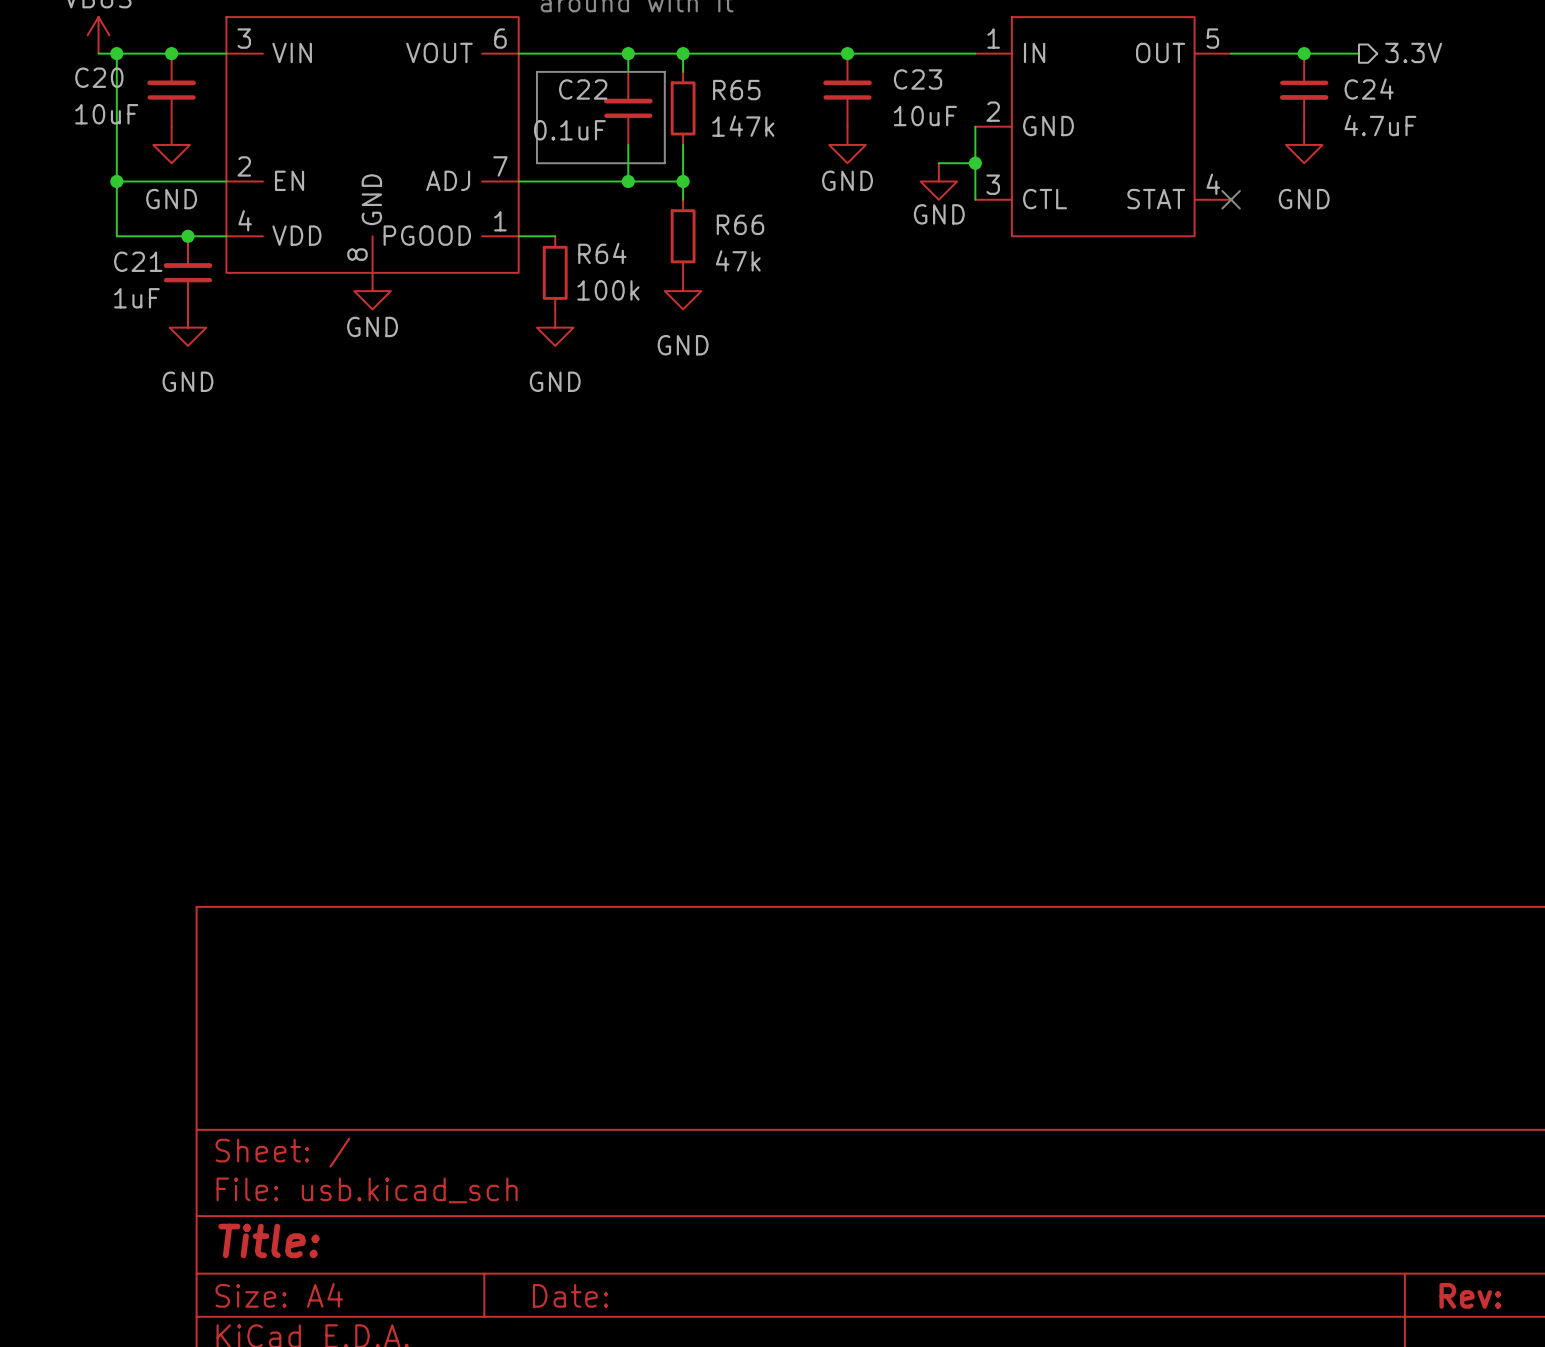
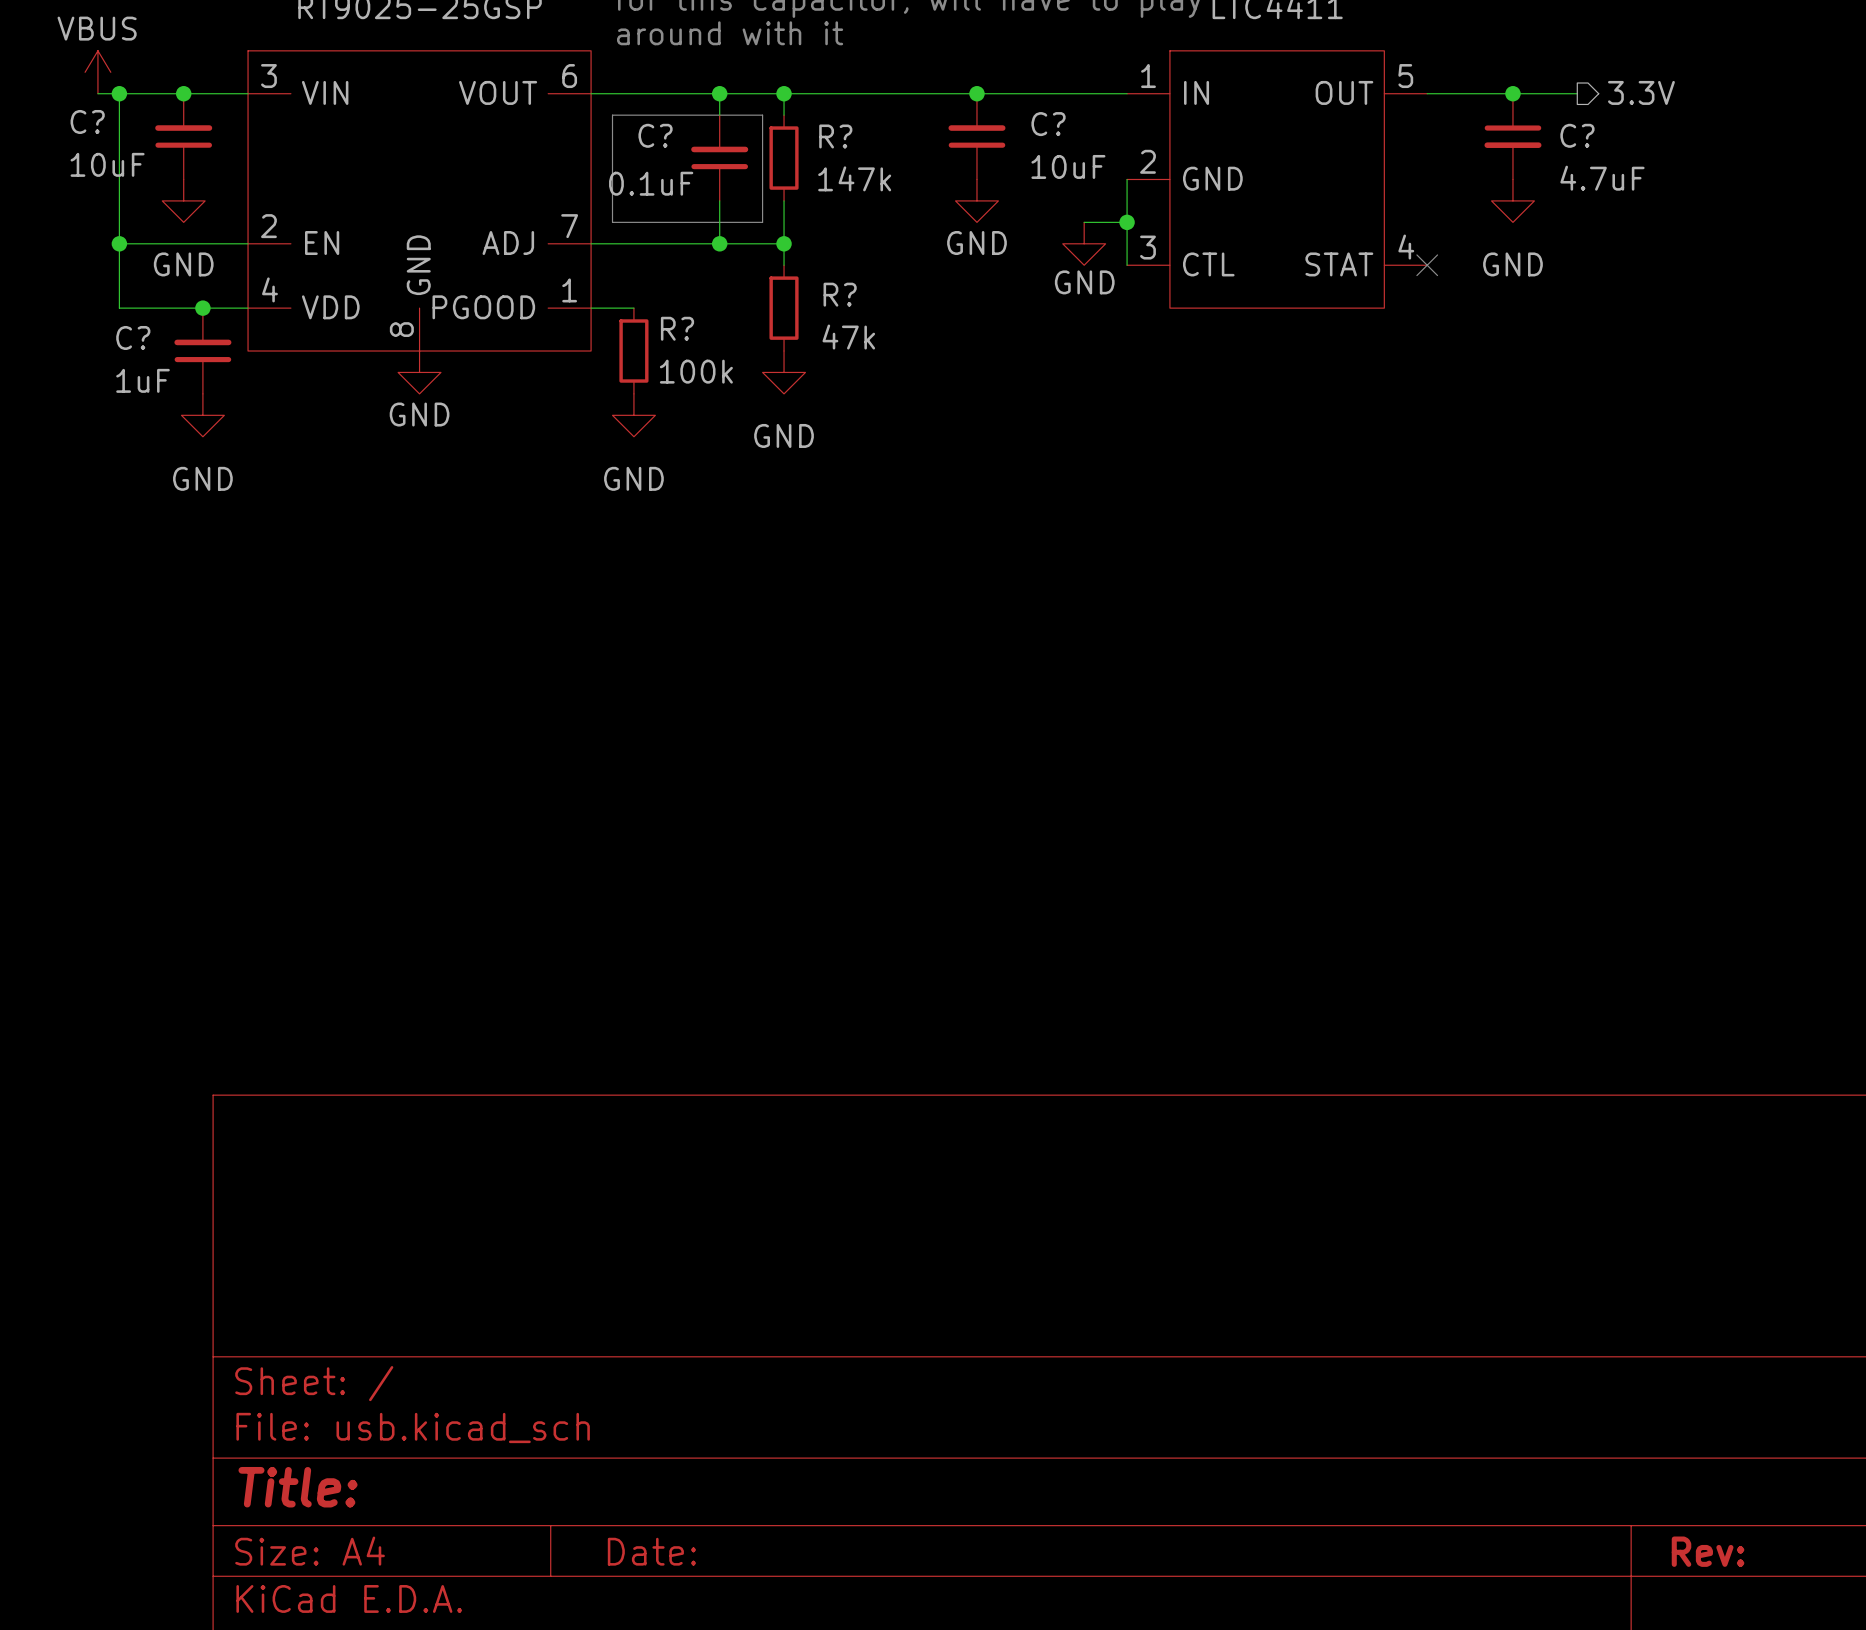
C20 name: C20 (99, 77) -> C? (87, 121)
C23 name: C23 (918, 79) -> C? (1048, 124)
C22 name: C22 (583, 89) -> C? (655, 135)
C24 name: C24 (1369, 89) -> C? (1577, 135)
R65 name: R65 (736, 90) -> R? (835, 136)
R66 name: R66 (740, 224) -> R? (840, 294)
R64 name: R64 (602, 253) -> R? (677, 328)
C21 name: C21 (138, 261) -> C? (133, 337)

